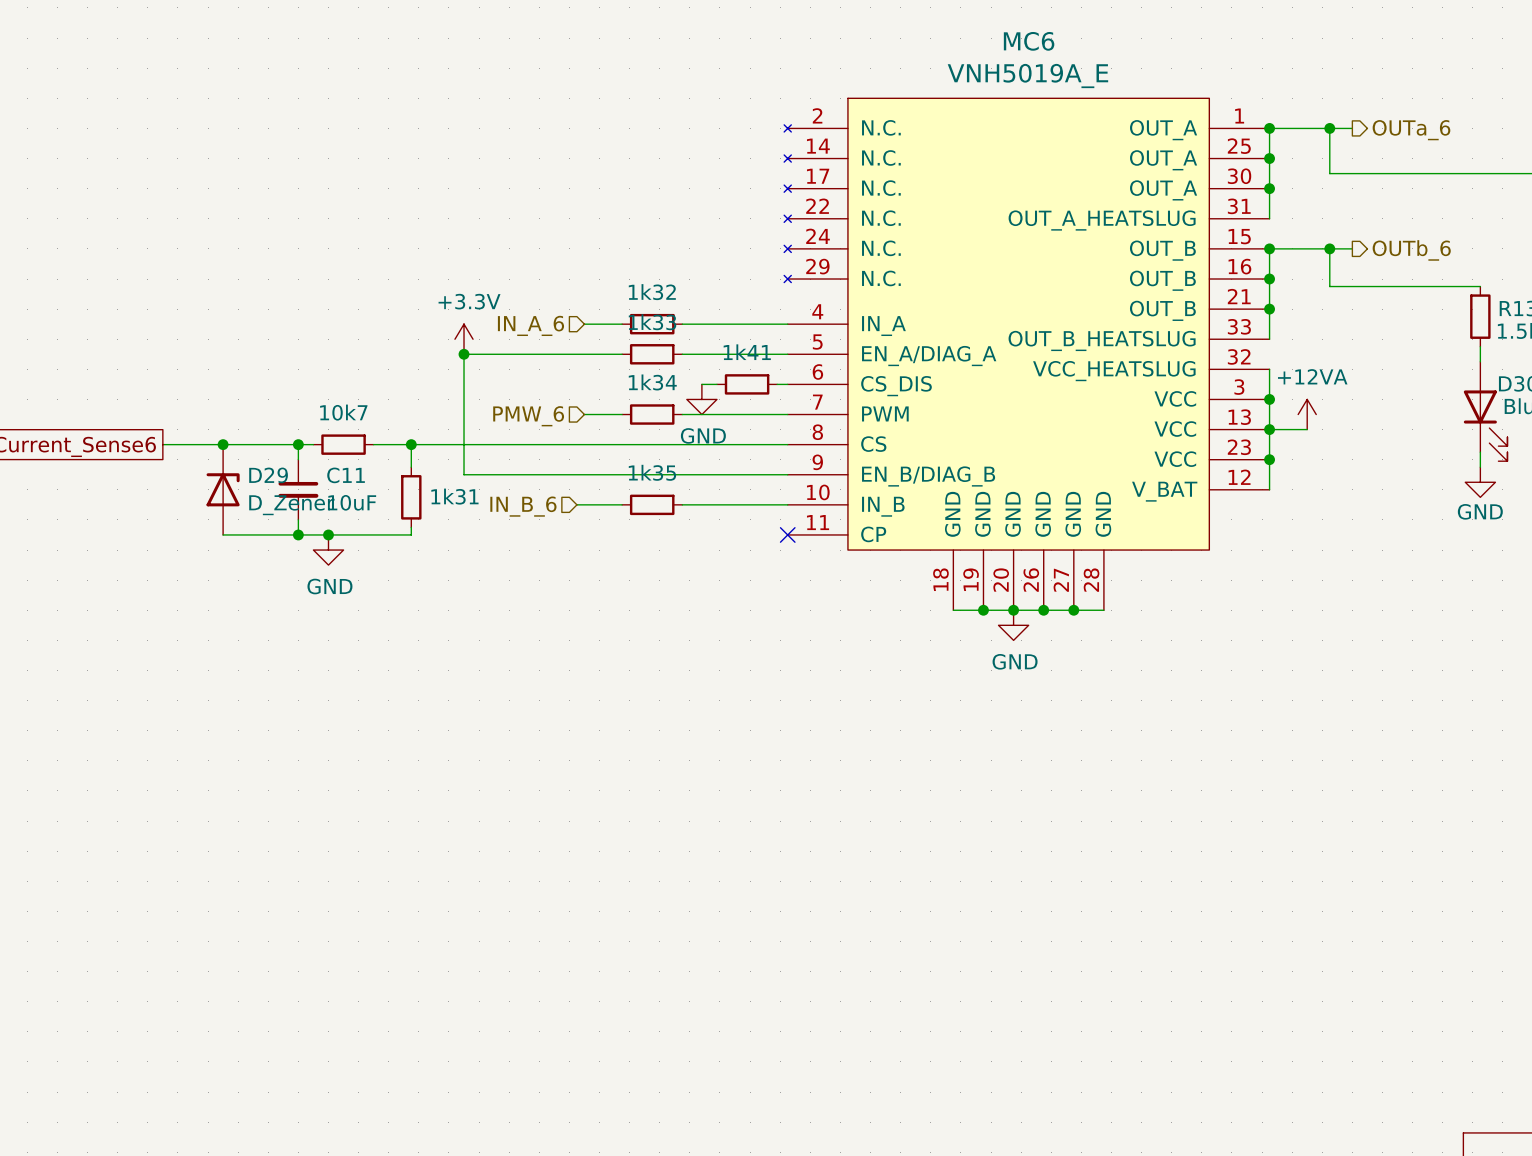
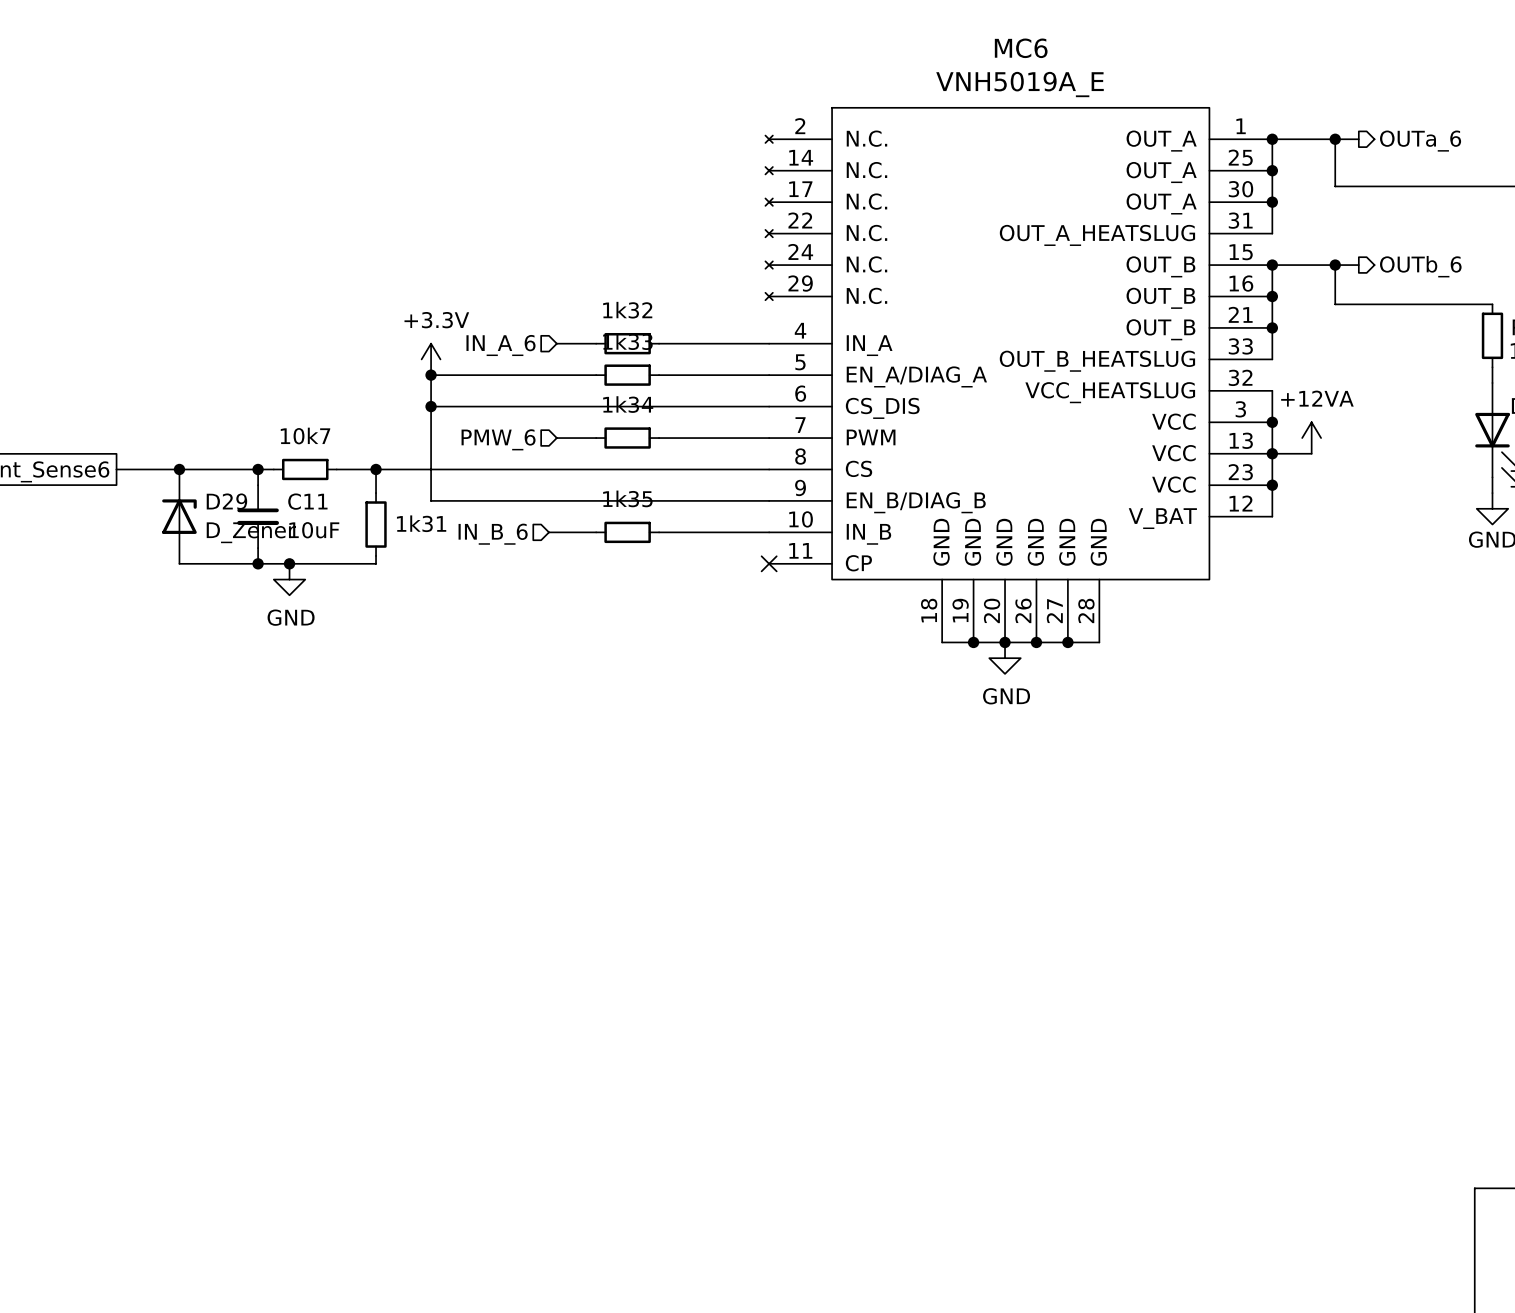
wire: none -> (431, 406) (679, 406)
junction: none -> (431, 406)
wire: none -> (695, 406) (758, 406)
1k41: (747, 384) -> none
power symbol: GND (701, 399) -> none

